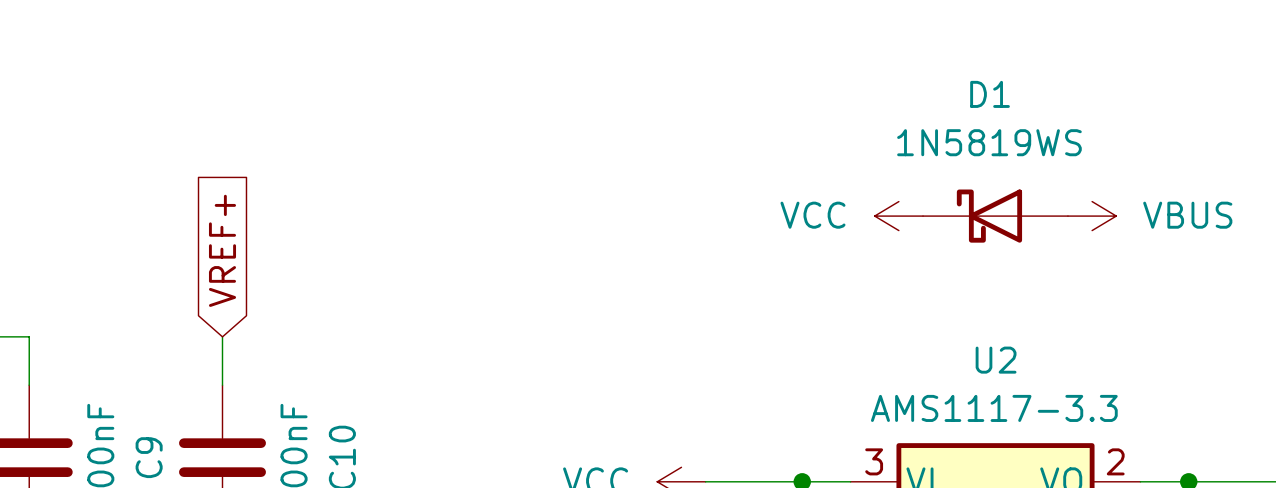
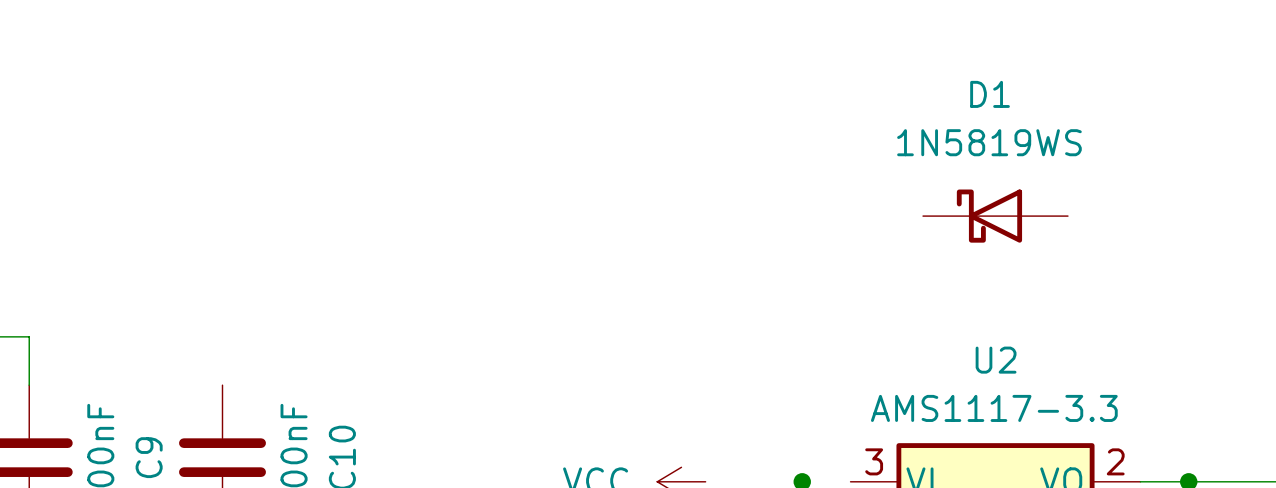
power symbol: VCC (898, 216) -> none
power symbol: VBUS (1092, 216) -> none
global label: VREF+ (222, 250) -> none
wire: (222, 336) (222, 385) -> none
wire: (705, 481) (850, 481) -> none

